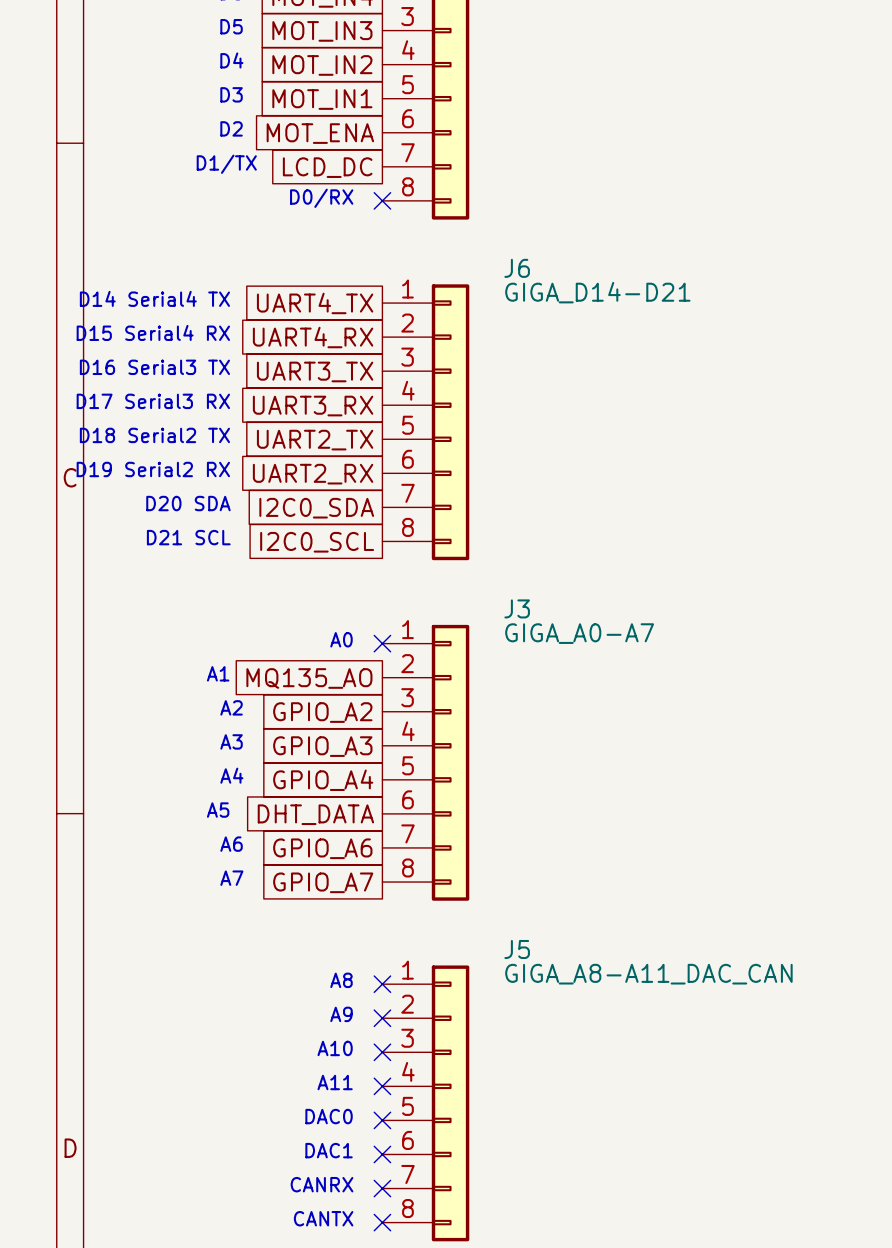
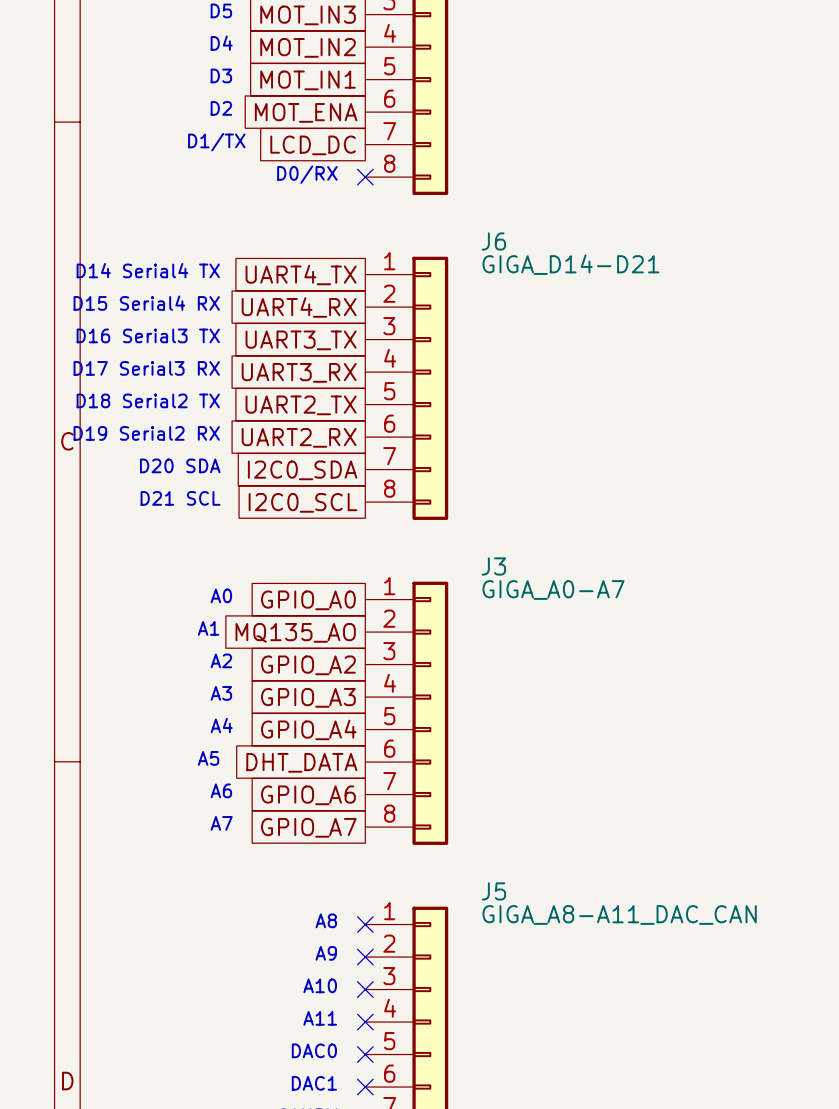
text position: A0 (341, 639) -> A0 (221, 595)
no-connect mark: (382, 643) -> none
global label: none -> GPIO_A0 (308, 600)

